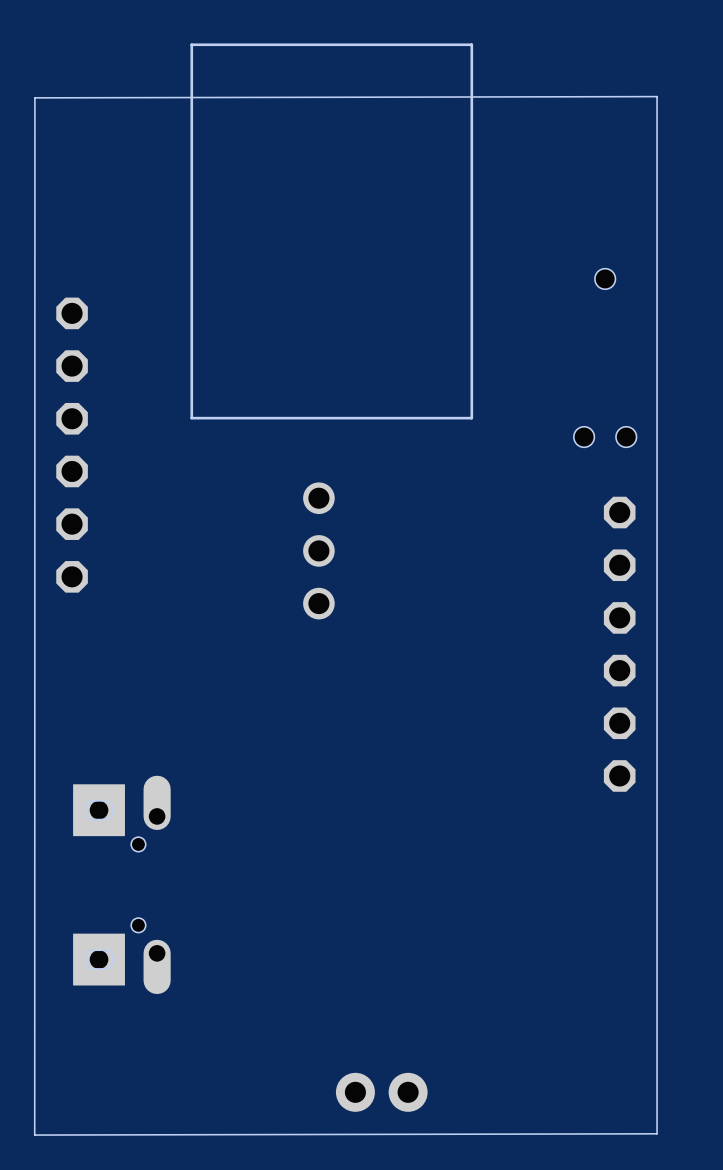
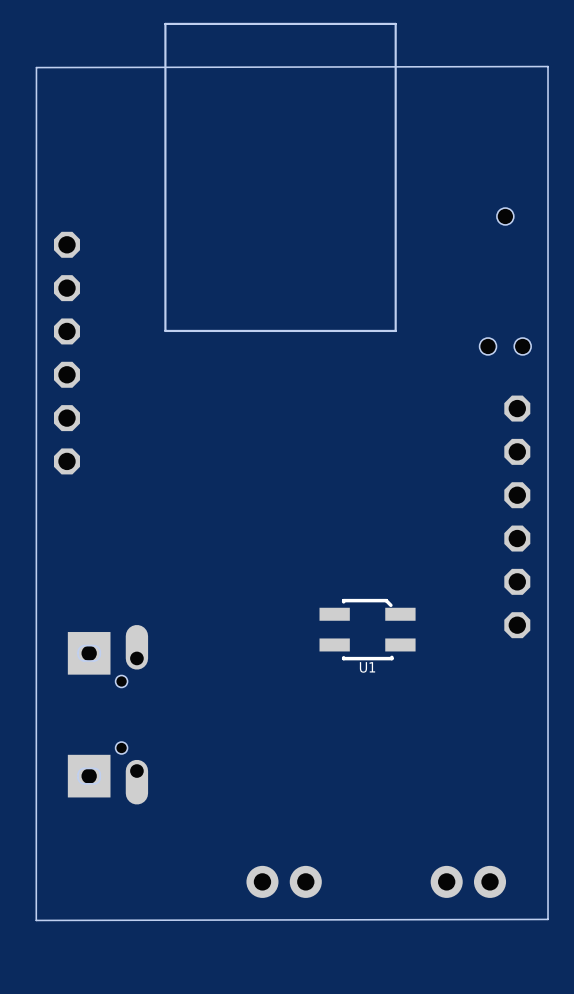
part: (318, 550) -> none
U1: none -> (367, 629)
part: none -> (468, 881)
part position: (381, 1092) -> (284, 881)

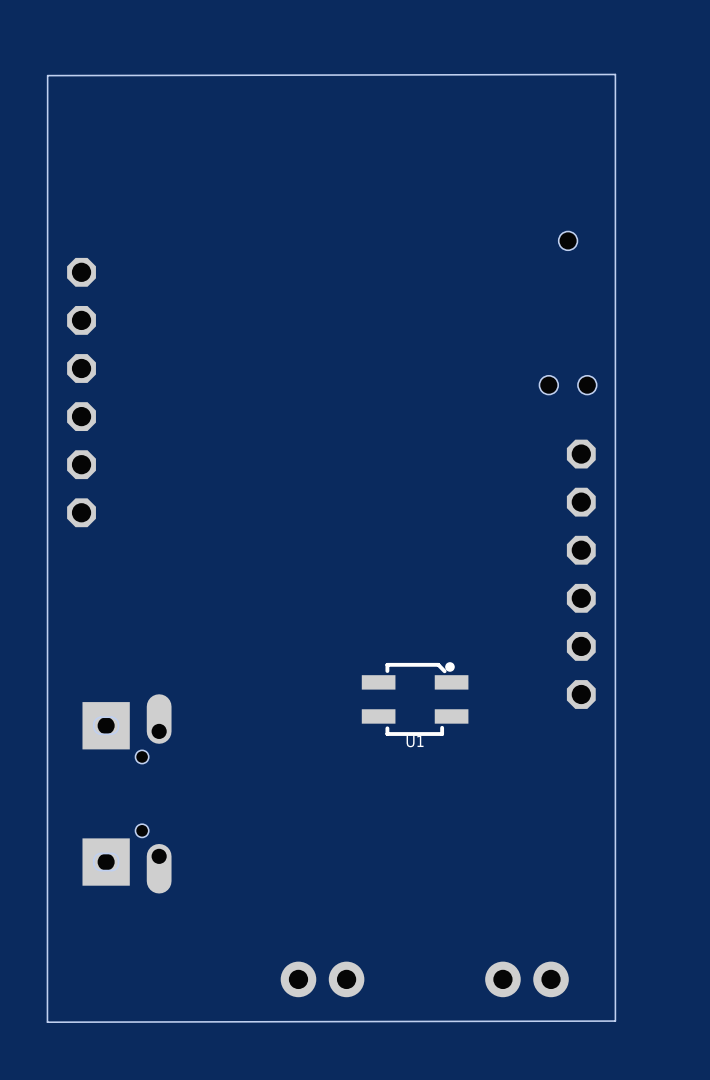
part: (280, 177) -> none
U1 footprint: [319, 598, 416, 661] -> [361, 662, 469, 736]

